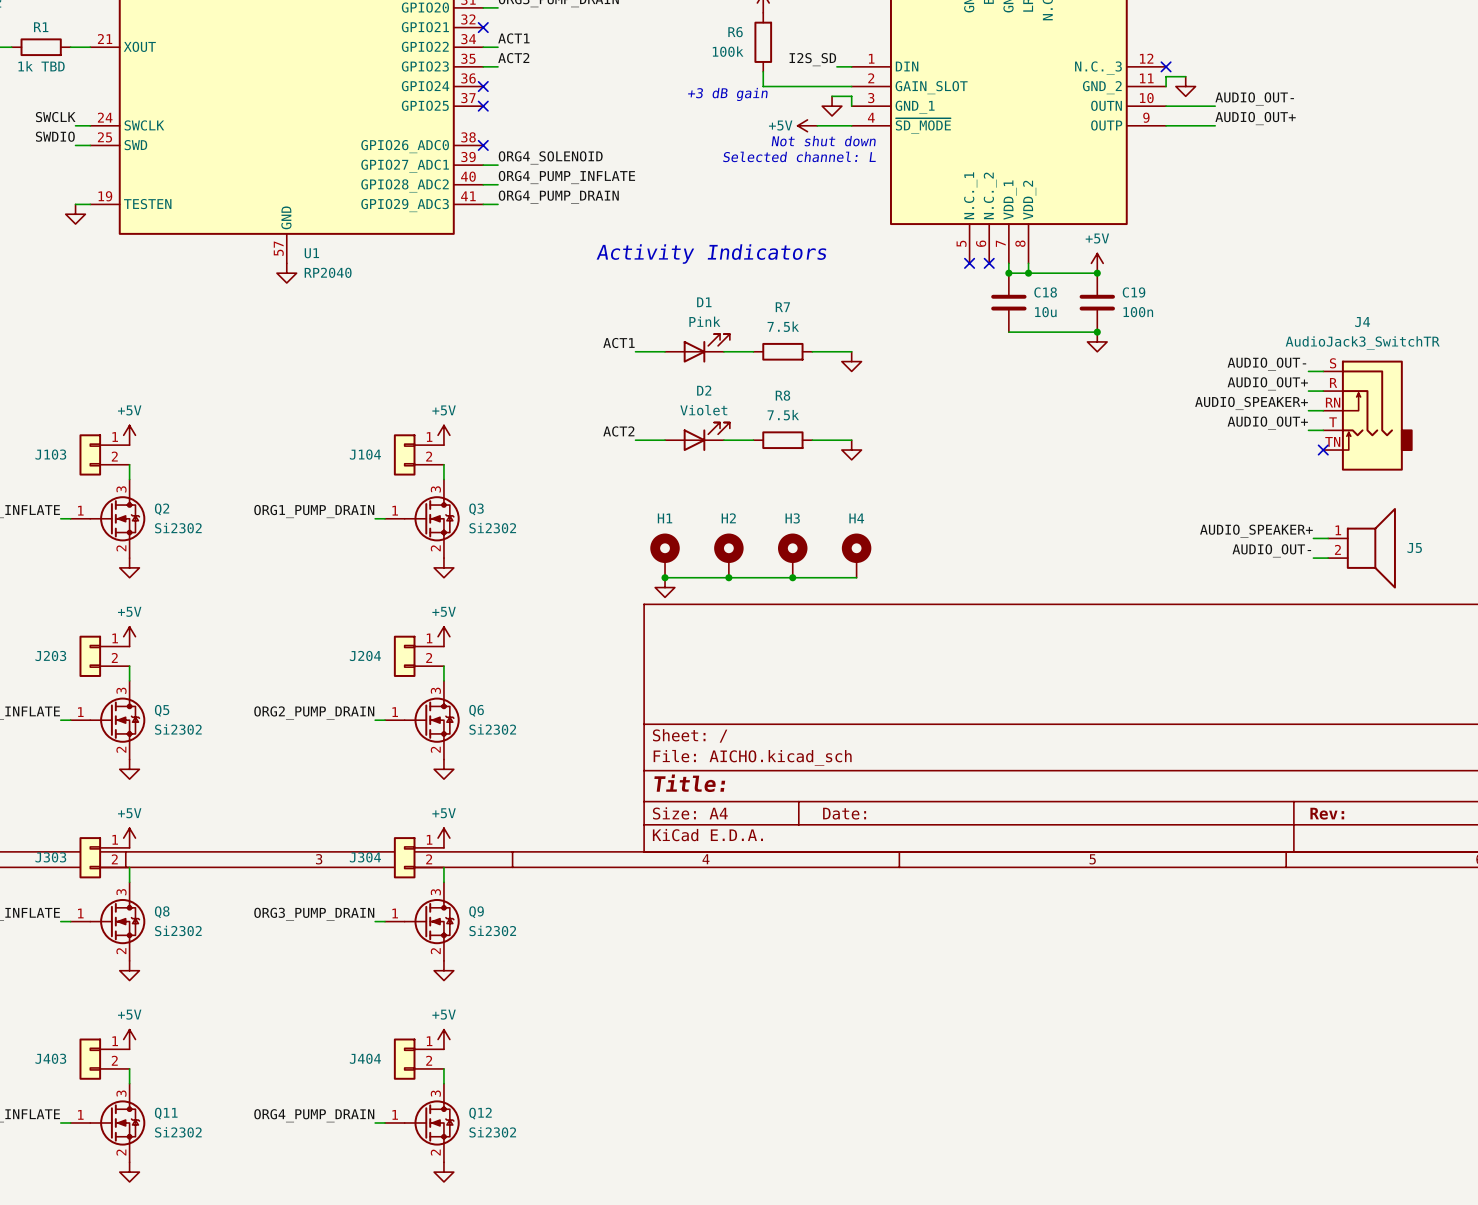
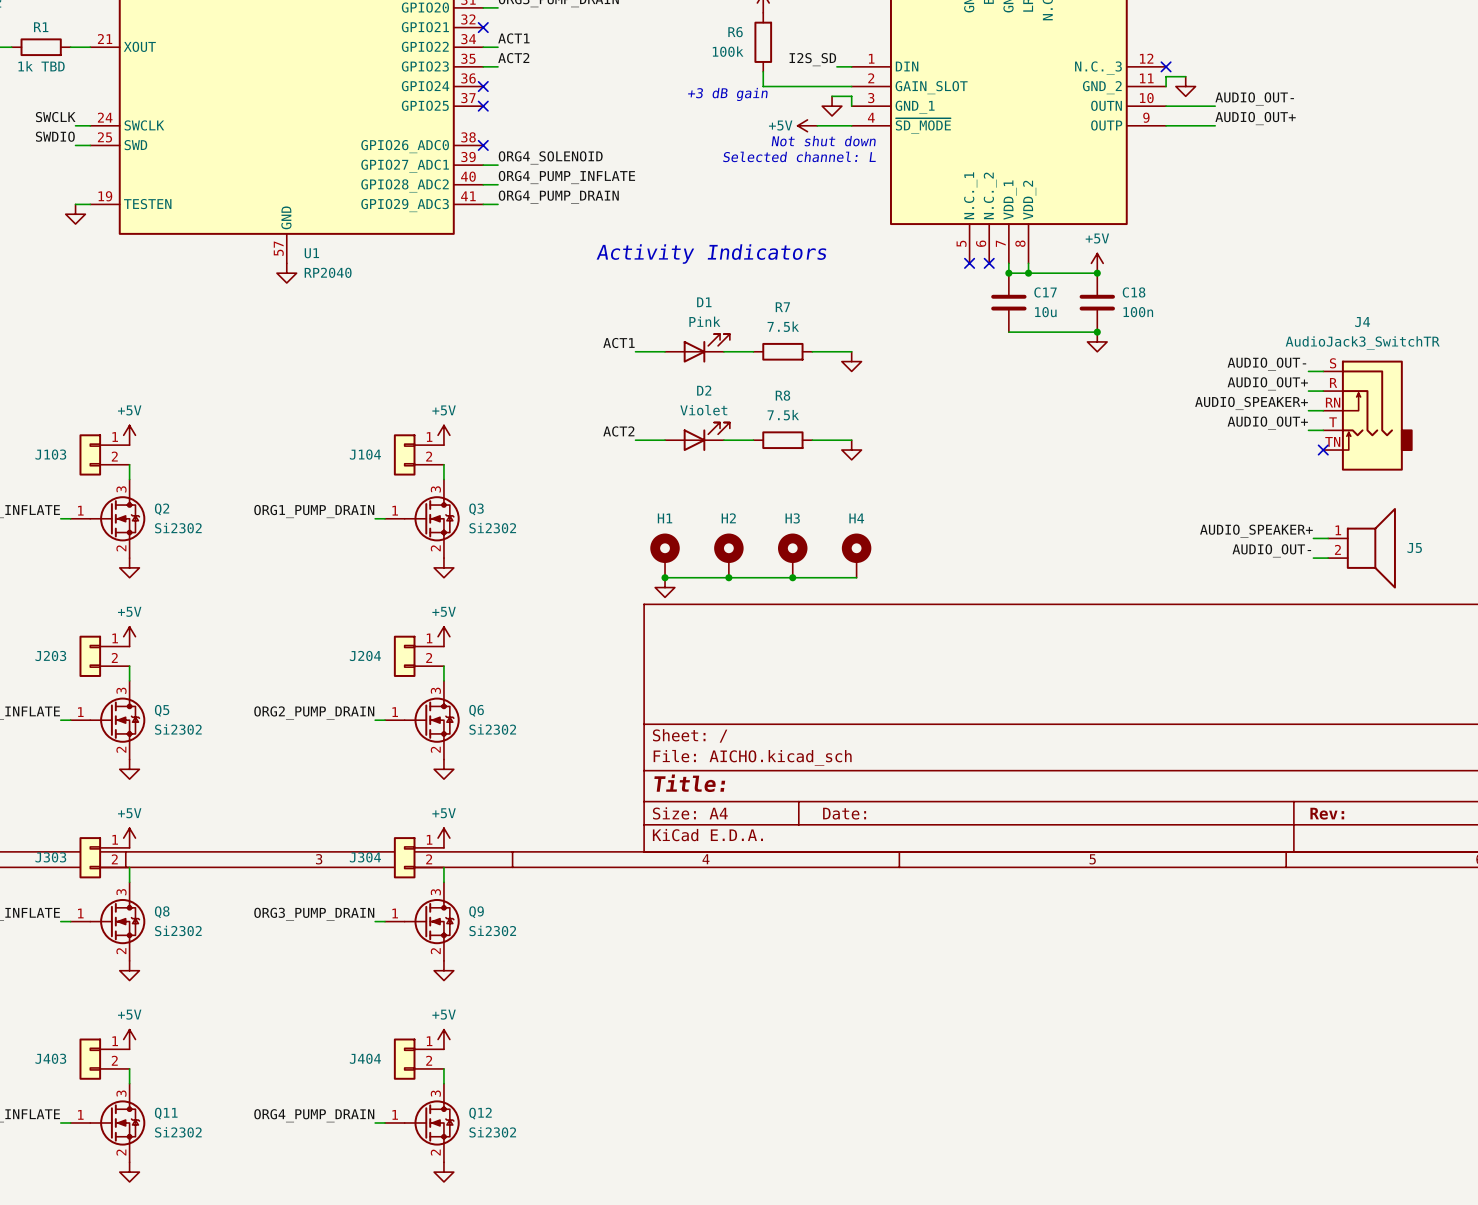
C18 name: C18 (1045, 292) -> C17 (1045, 292)
C19 name: C19 (1134, 292) -> C18 (1134, 292)

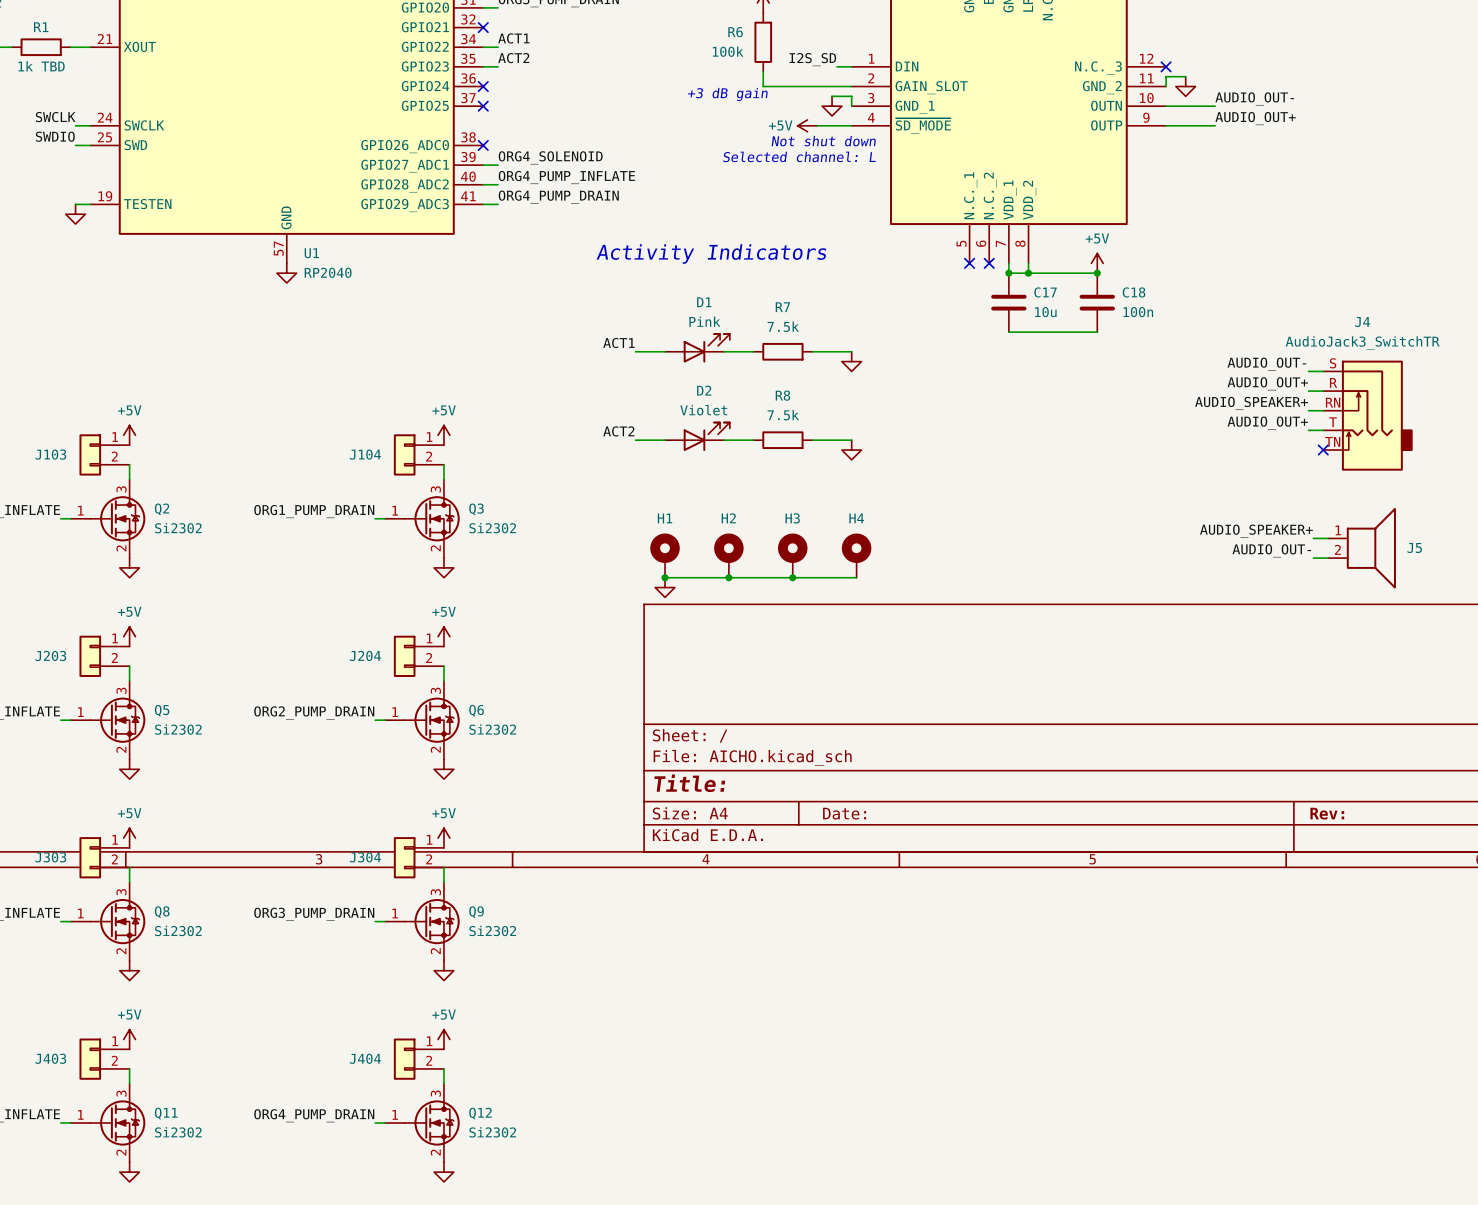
junction: (1097, 332) -> none
power symbol: (1097, 341) -> none

